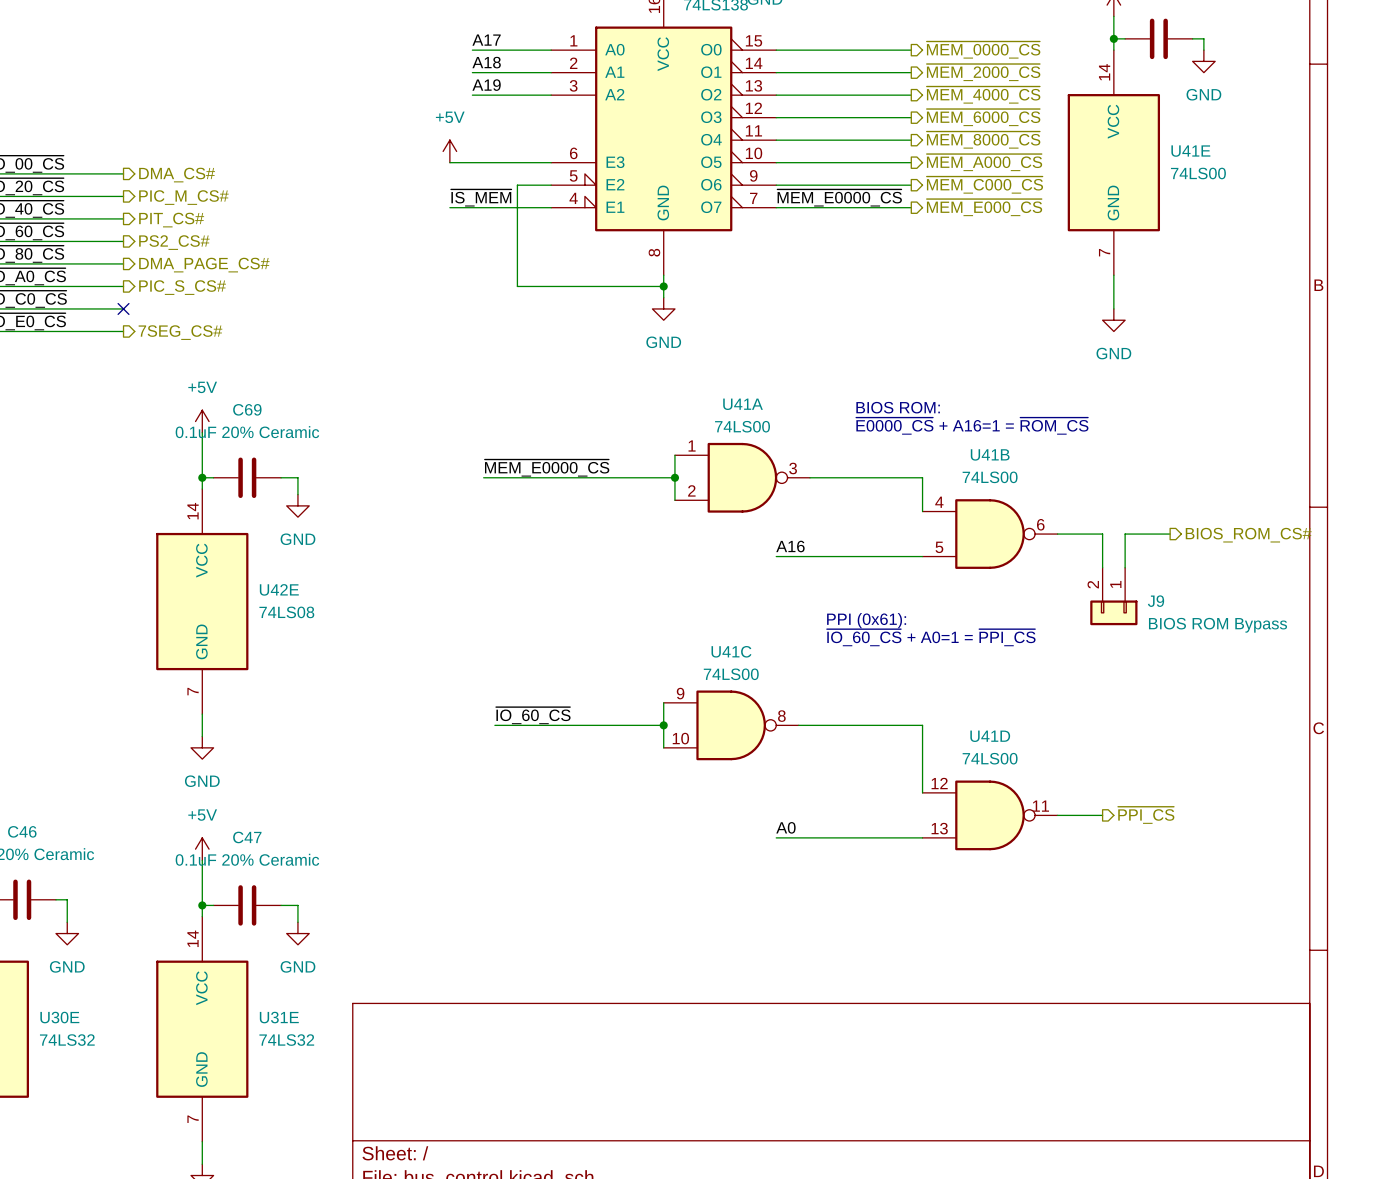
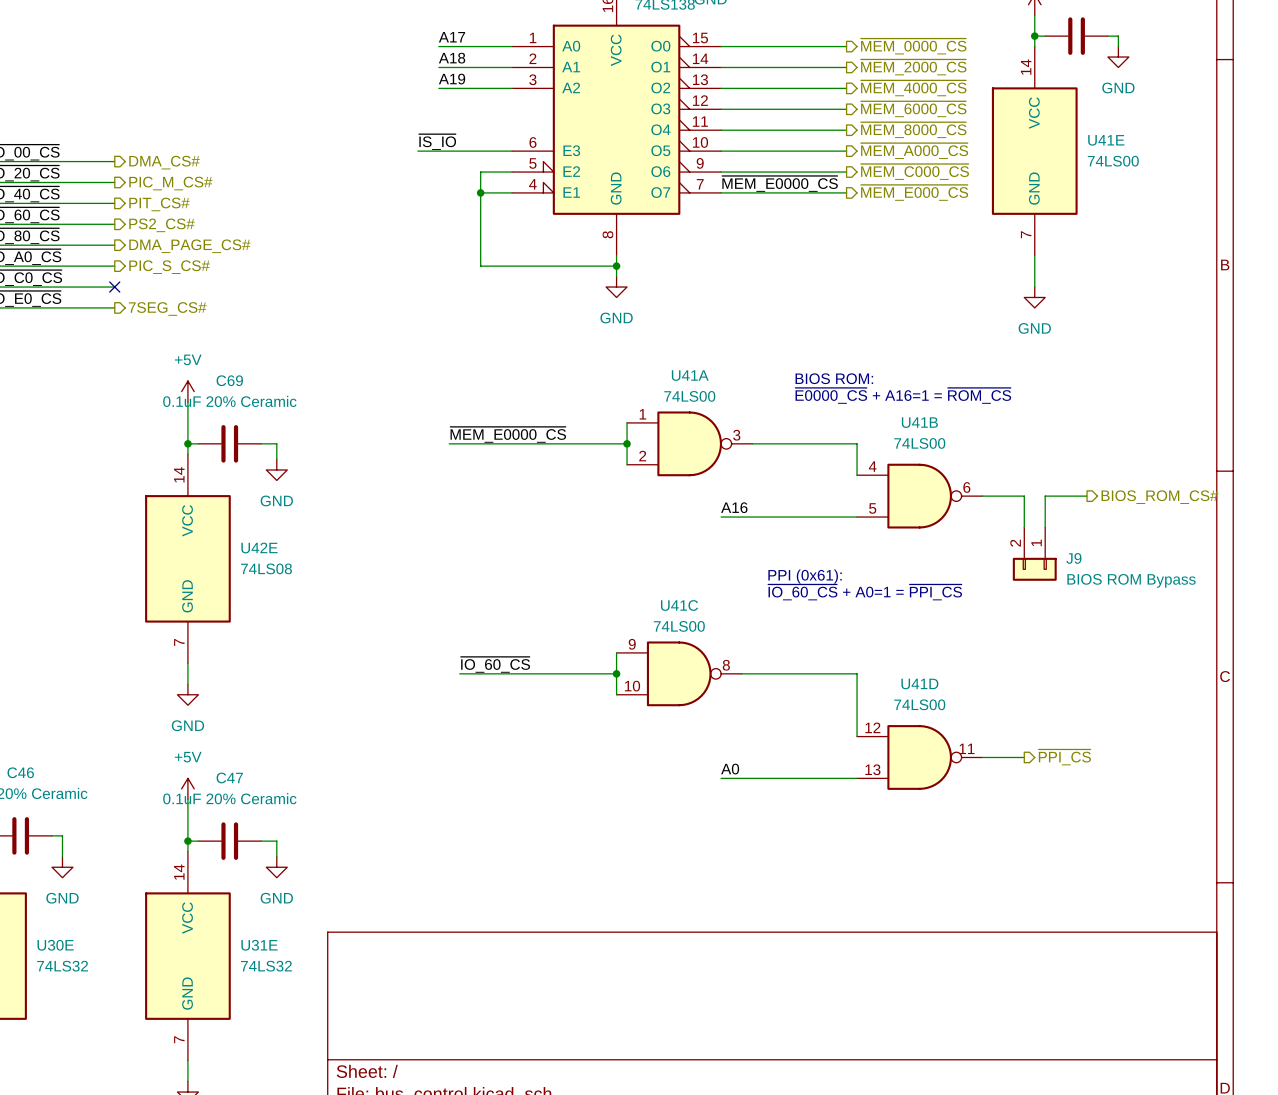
power symbol: +5V (449, 151) -> none
label: none -> ~{IS_IO} (437, 142)
label: ~{IS_MEM} (481, 197) -> none
wire: (449, 207) (517, 207) -> none
junction: none -> (480, 192)

